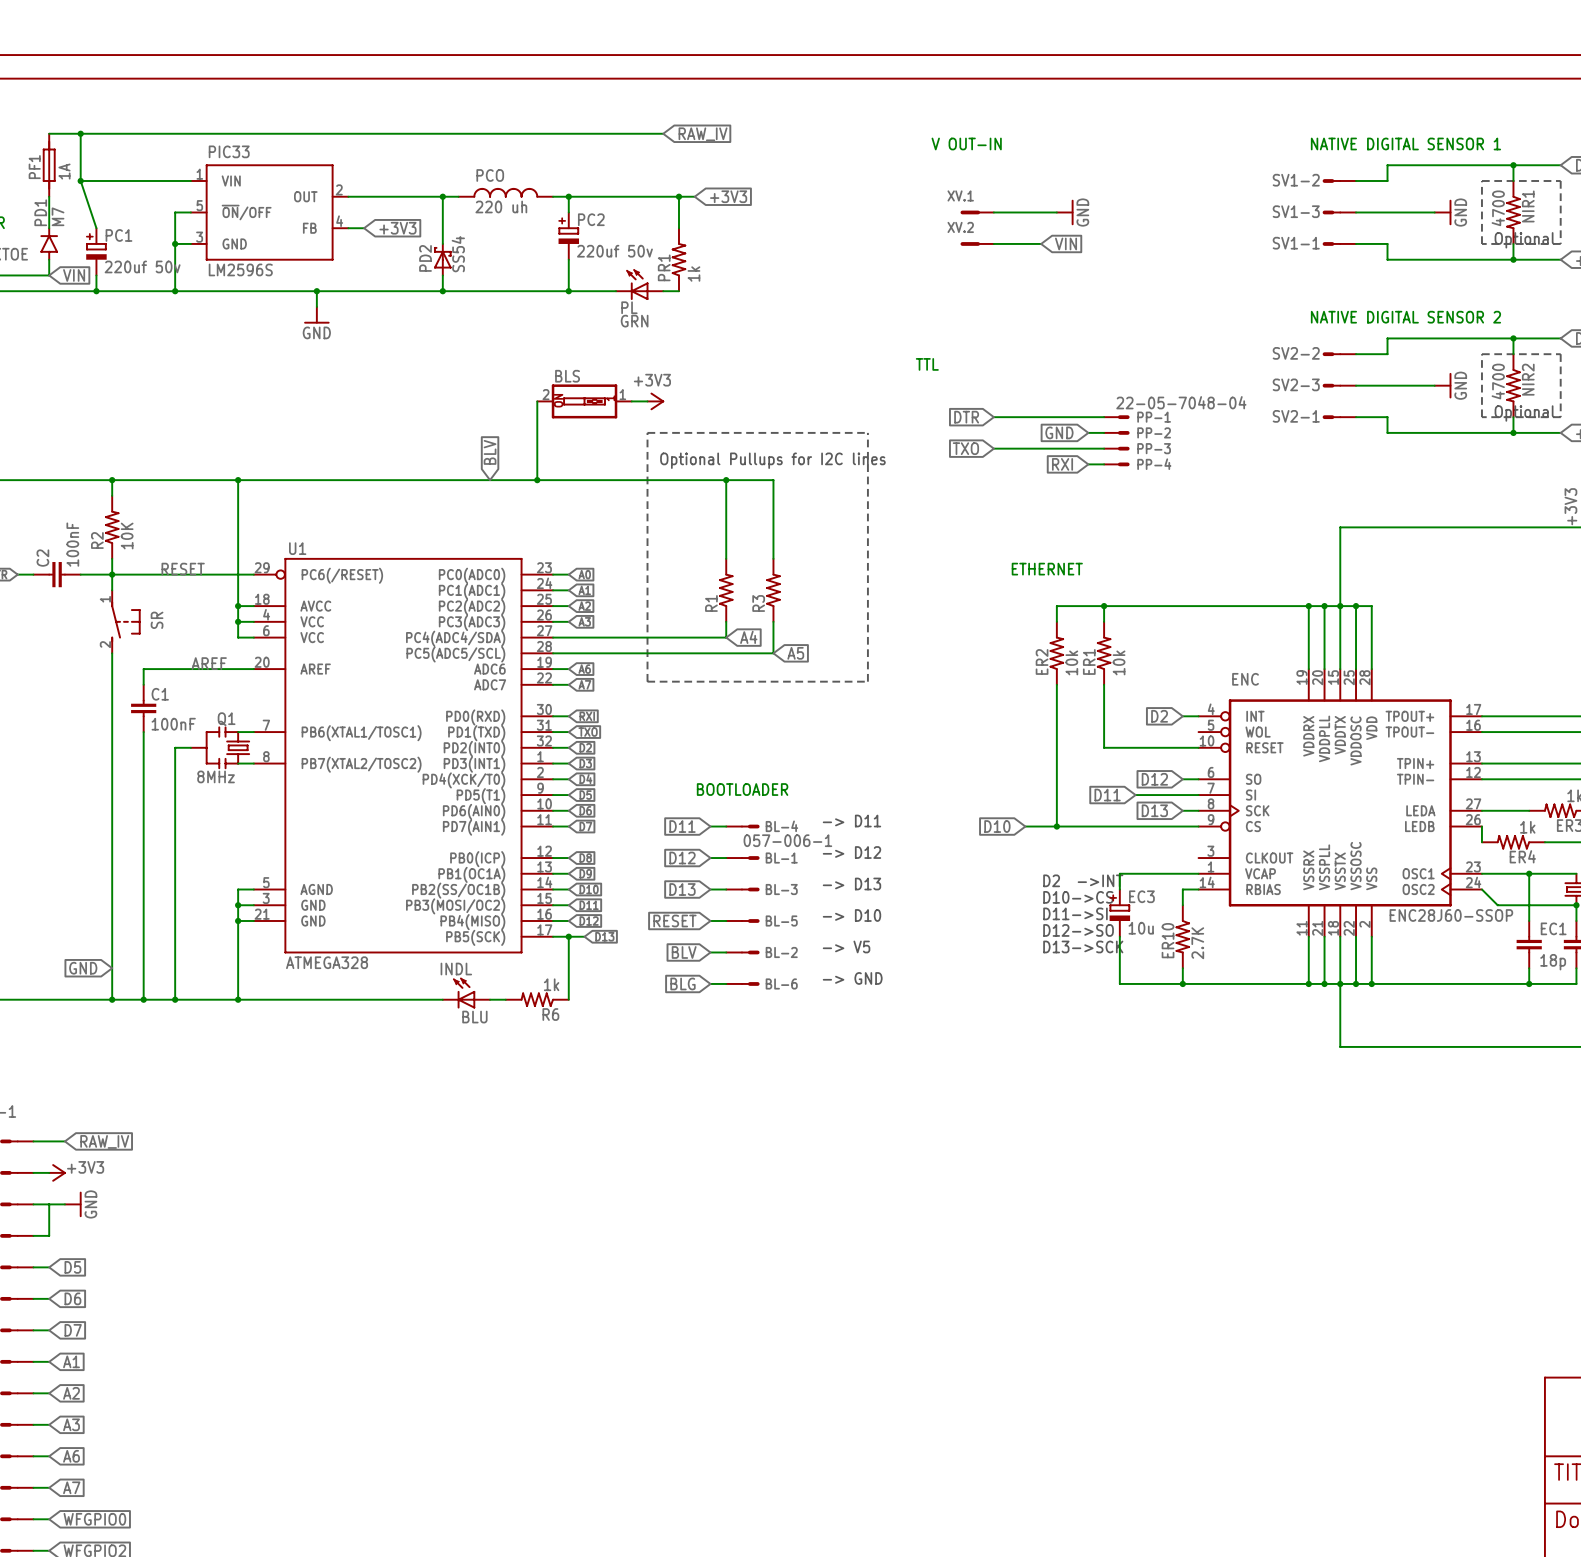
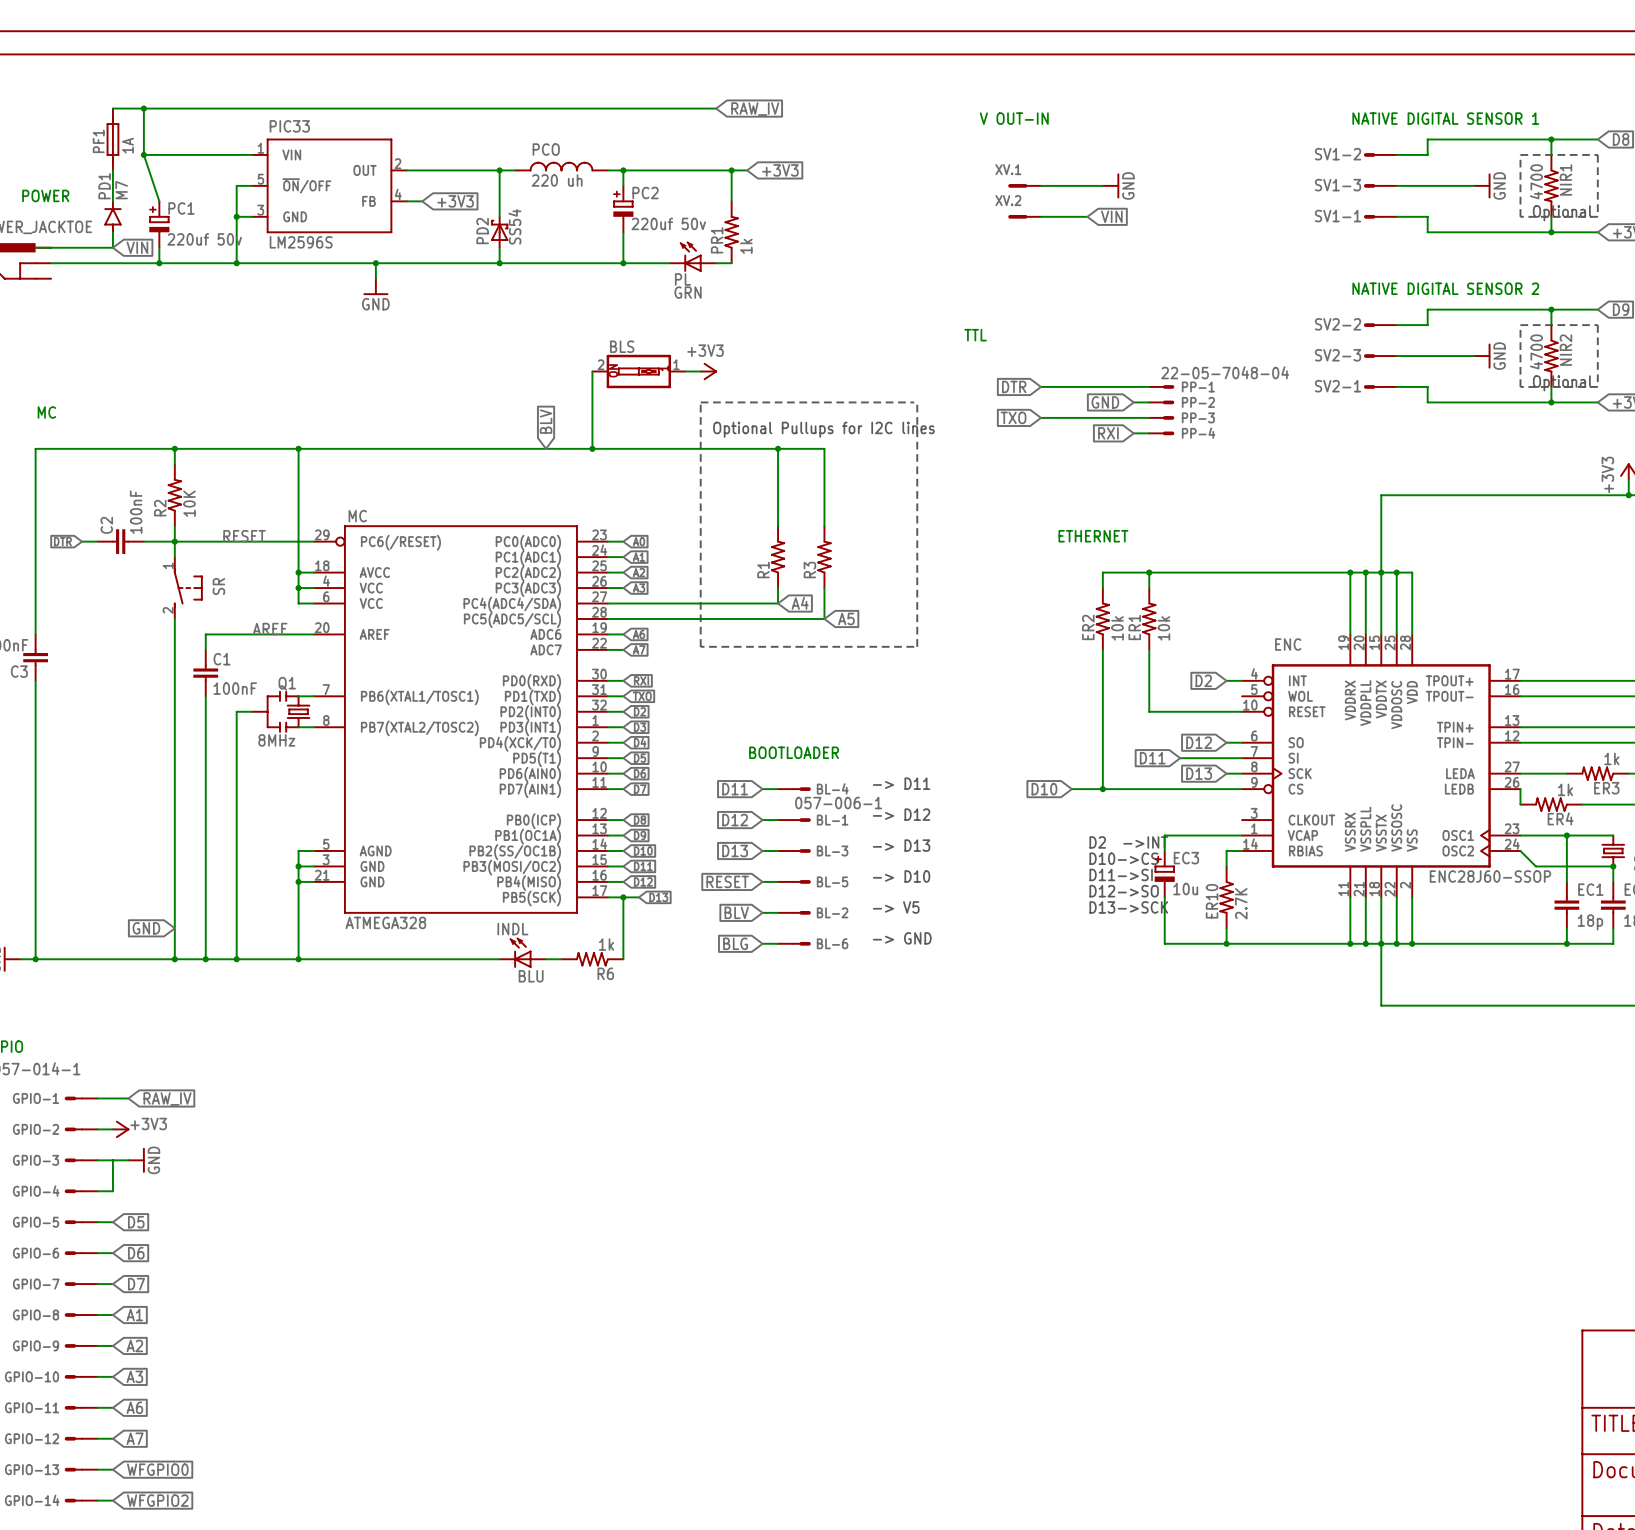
U1 name: U1 (297, 548) -> MC (357, 516)

